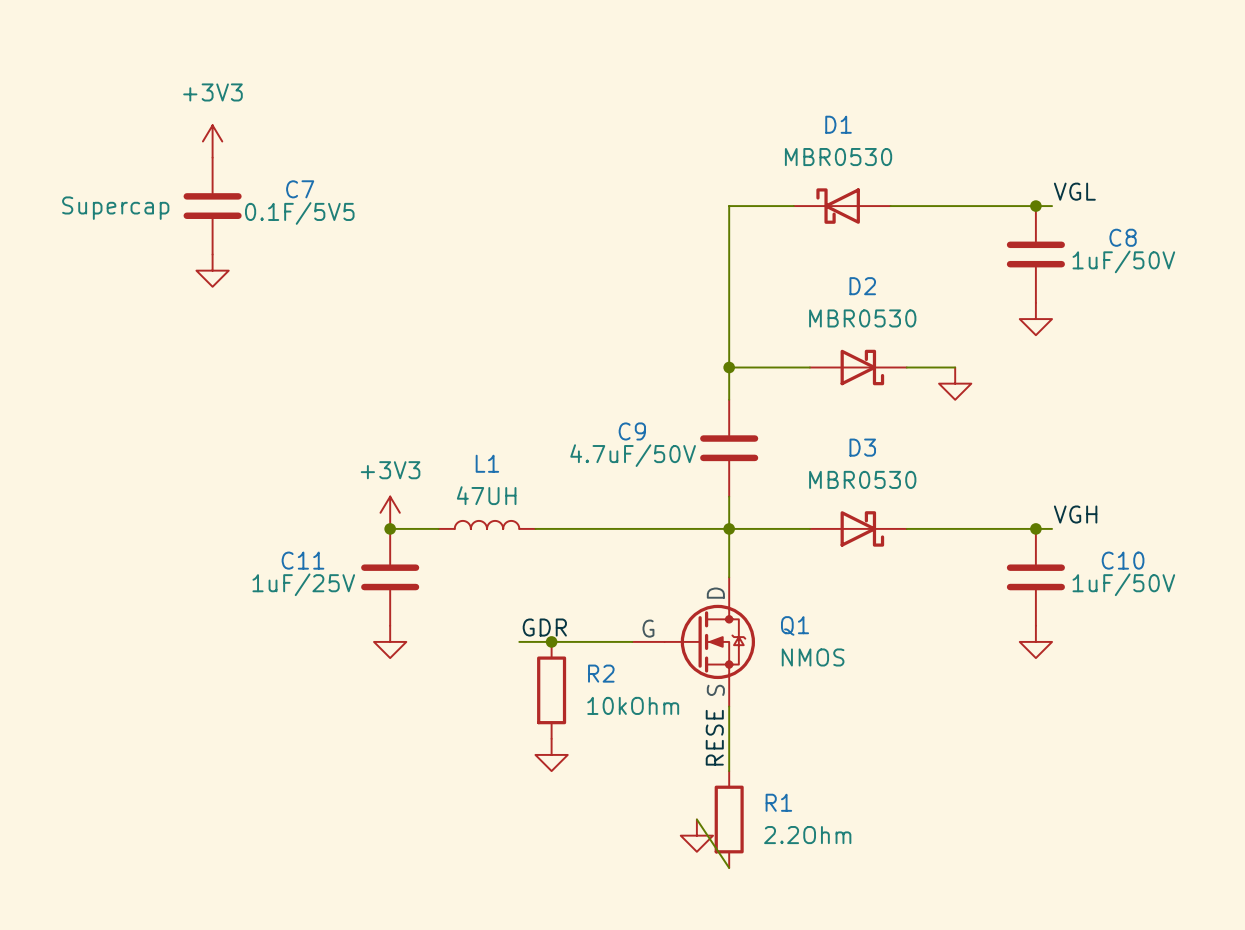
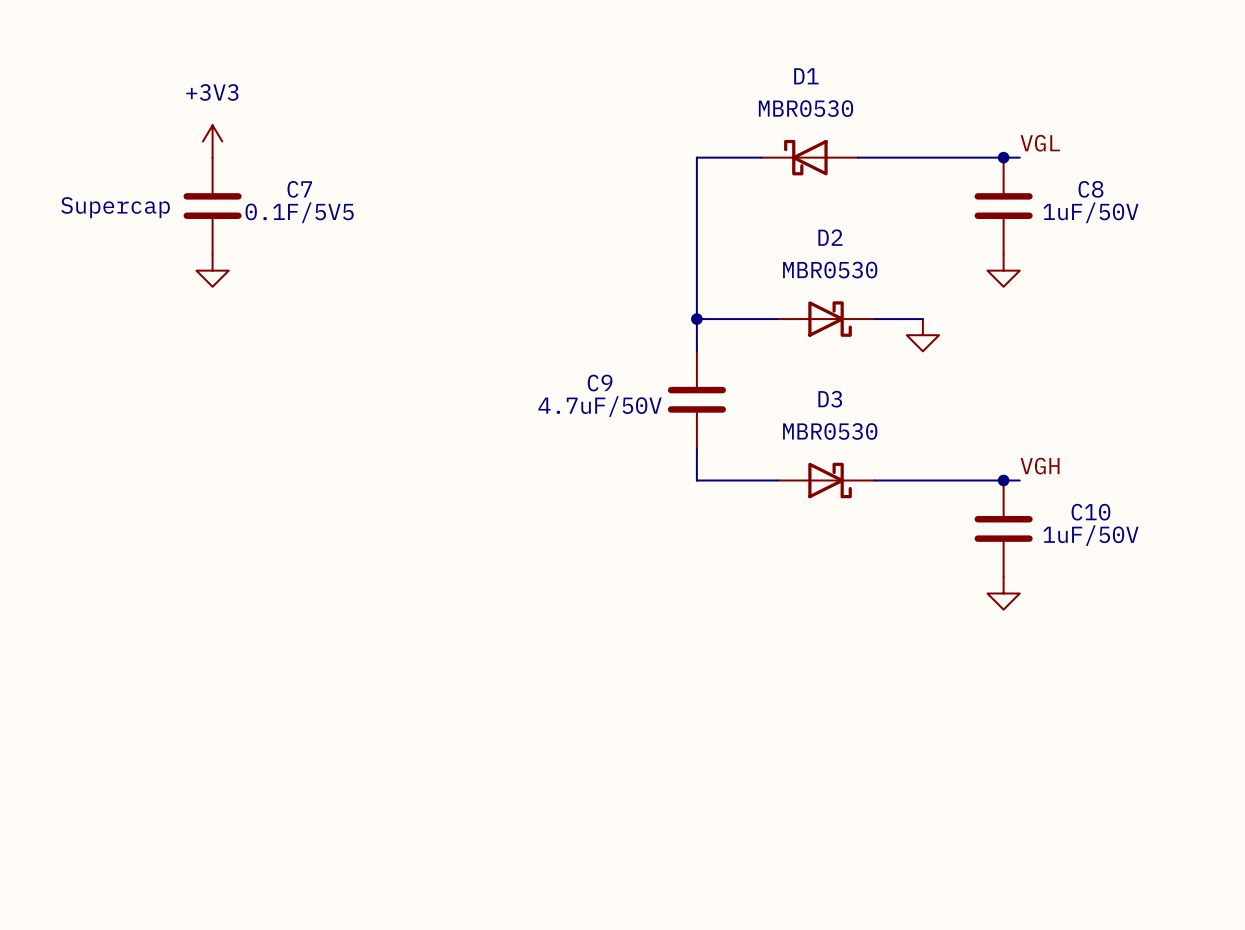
label position: VGL (1074, 191) -> VGL (1040, 143)
wire: (793, 206) (729, 206) (729, 399) -> (761, 157) (696, 157) (696, 351)
D1 position: (842, 206) -> (809, 157)
wire: (890, 206) (1052, 206) -> (858, 157) (1019, 157)
junction position: (1035, 206) -> (1003, 157)
C8 position: (1035, 254) -> (1003, 206)
power symbol: none -> (1003, 270)
power symbol: (1035, 319) -> none
power symbol: none -> (922, 335)
wire: (729, 367) (809, 367) -> (696, 319) (777, 319)
junction position: (729, 367) -> (696, 319)
D2 position: (858, 367) -> (826, 319)
wire: (906, 367) (955, 367) -> (874, 319) (922, 319)
power symbol: (955, 383) -> none
wire: none -> (696, 448) (696, 480) (777, 480)
C9 position: (729, 448) -> (696, 399)
wire: (729, 496) (729, 577) -> none
power symbol: +3V3 (390, 512) -> none
label position: VGH (1075, 514) -> VGH (1040, 466)
L1: 47UH (487, 524) -> none
wire: (390, 528) (438, 528) -> none
junction: (390, 528) -> none
wire: (535, 528) (809, 528) -> none
junction: (729, 528) -> none
D3 position: (858, 528) -> (826, 480)
wire: (906, 528) (1052, 528) -> (874, 480) (1019, 480)
junction position: (1035, 528) -> (1003, 480)
C11: 1uF/25V (390, 577) -> none
C10 position: (1035, 577) -> (1003, 528)
label: GDR (544, 627) -> none
power symbol: (390, 641) -> none
wire: (519, 641) (632, 641) -> none
junction: (551, 641) -> none
Q1: NMOS (693, 641) -> none
power symbol position: (1035, 641) -> (1003, 593)
R2: 10kOhm (551, 690) -> none
wire: (729, 706) (729, 771) -> none
label: RESE (714, 737) -> none
power symbol: (551, 754) -> none
wire: (696, 819) (729, 867) -> none
R1: 2.2Ohm (729, 819) -> none
power symbol: (696, 835) -> none

